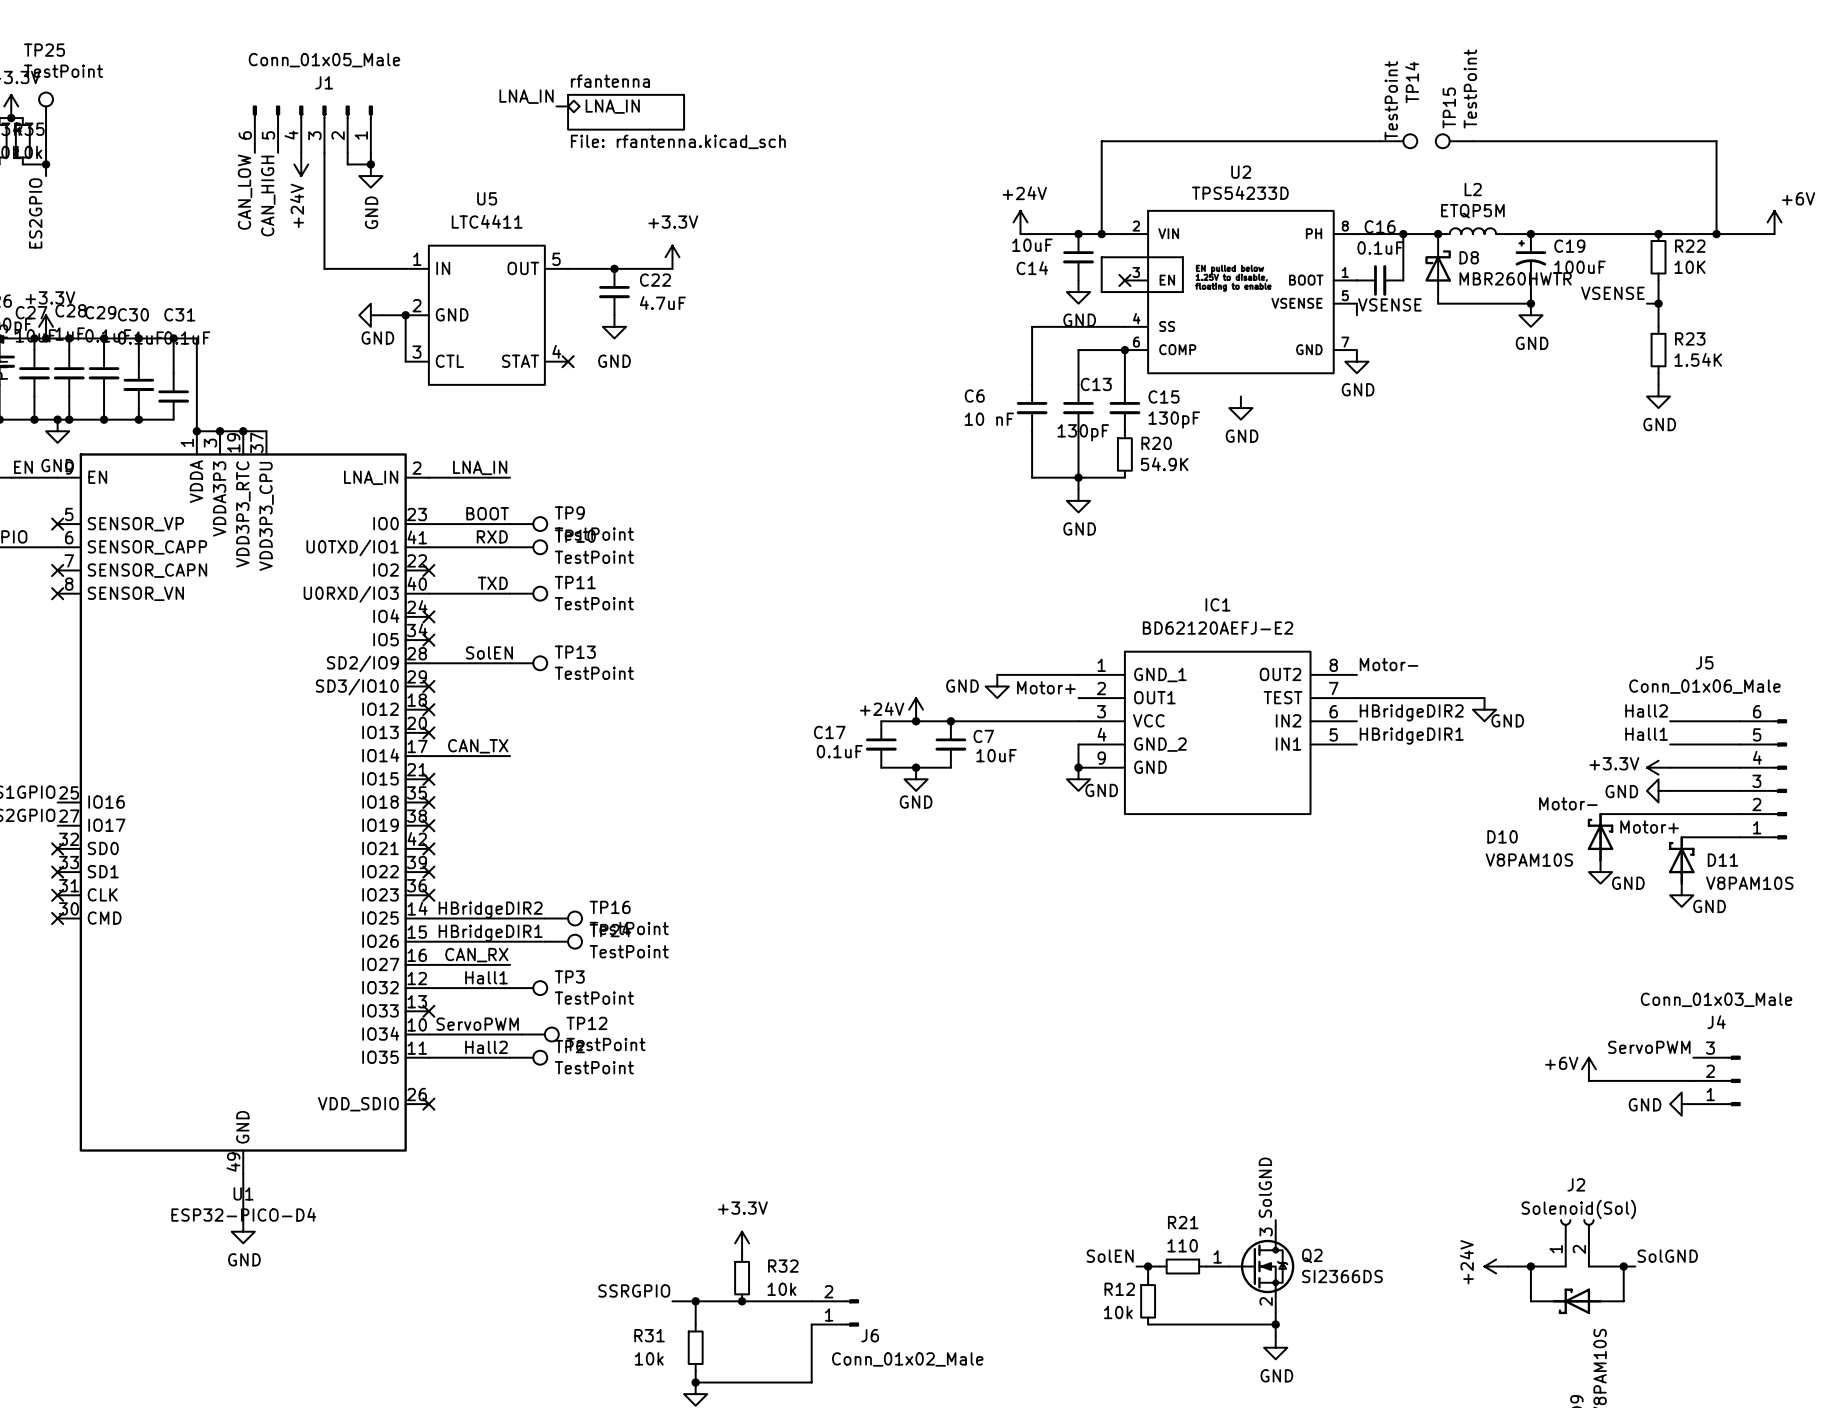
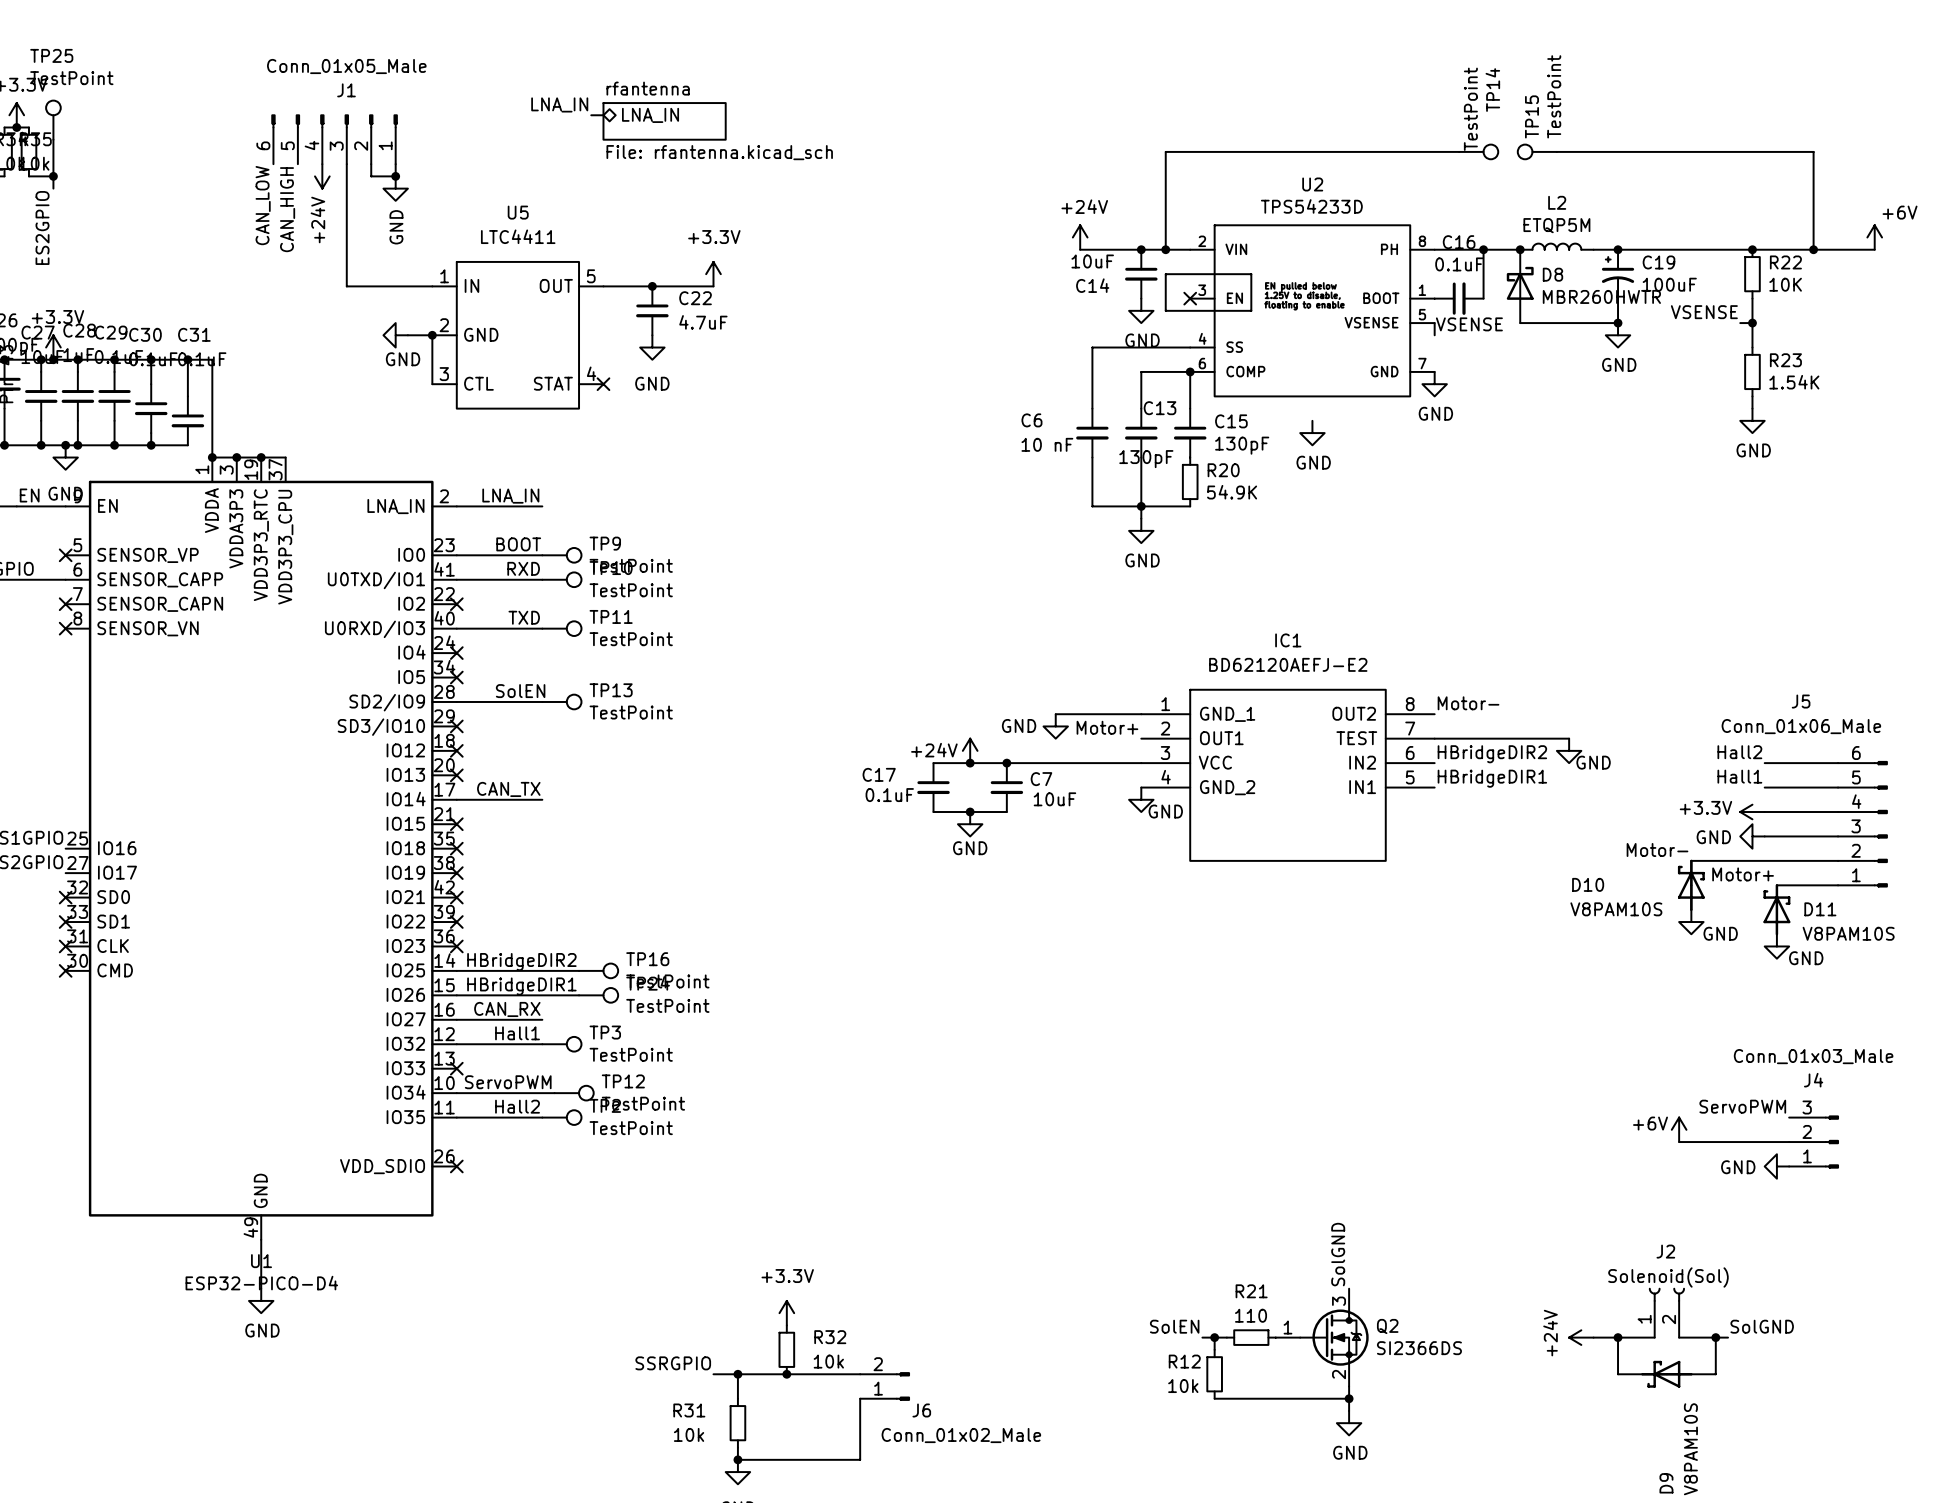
IC1 symbol: [1078, 650, 1357, 815] -> [1141, 689, 1435, 862]
junction: (1078, 767) -> none
power symbol position: GND (1078, 779) -> GND (1141, 799)

